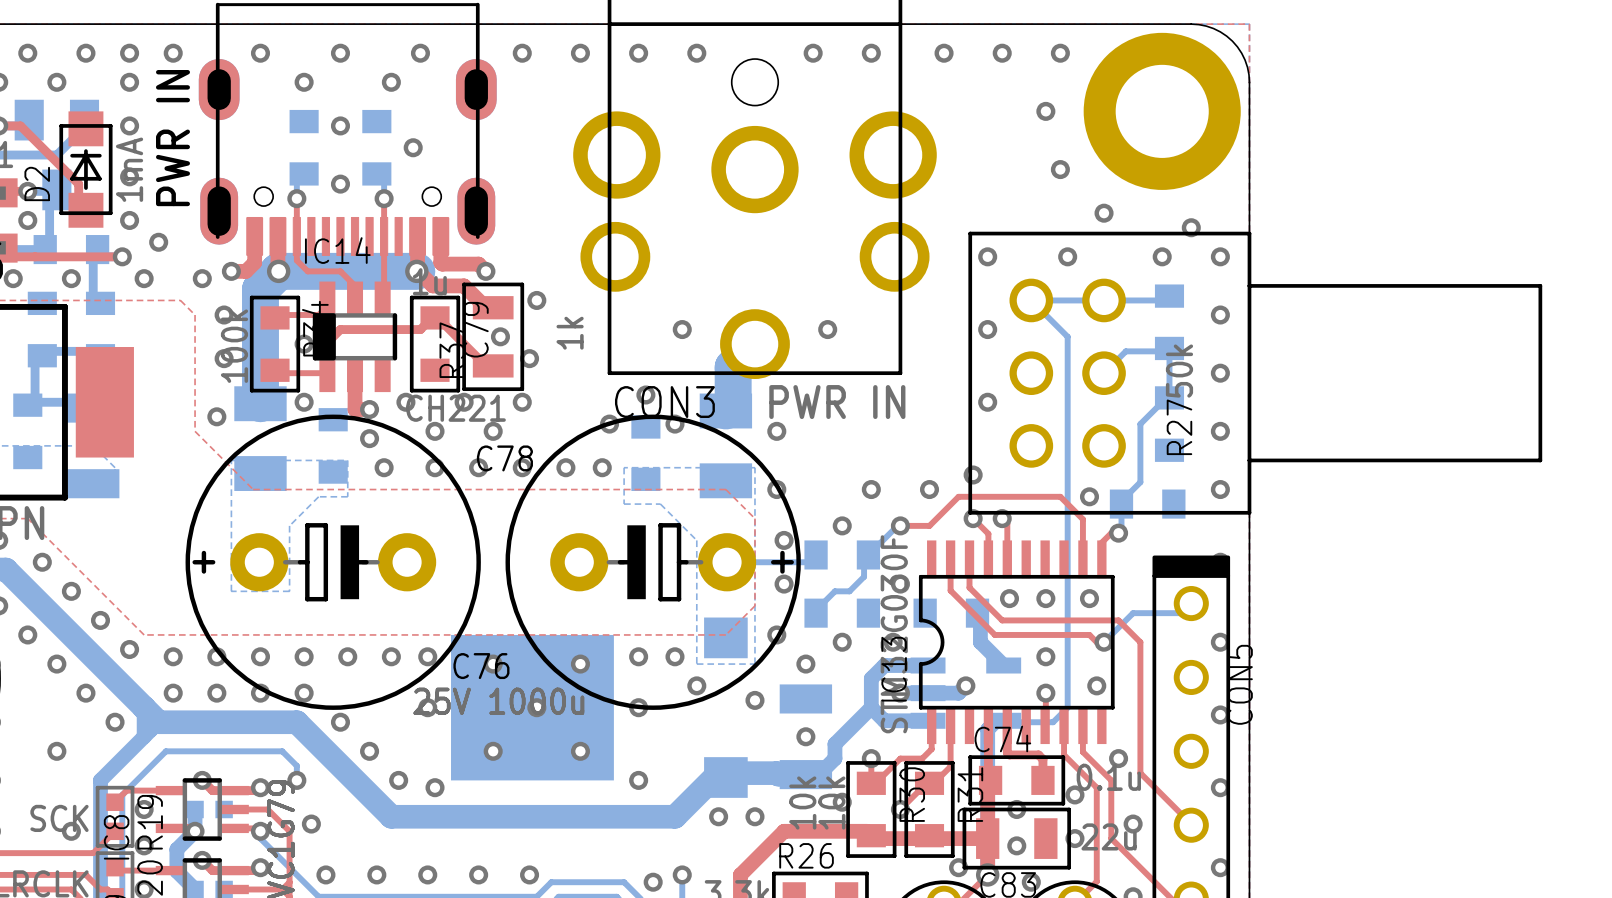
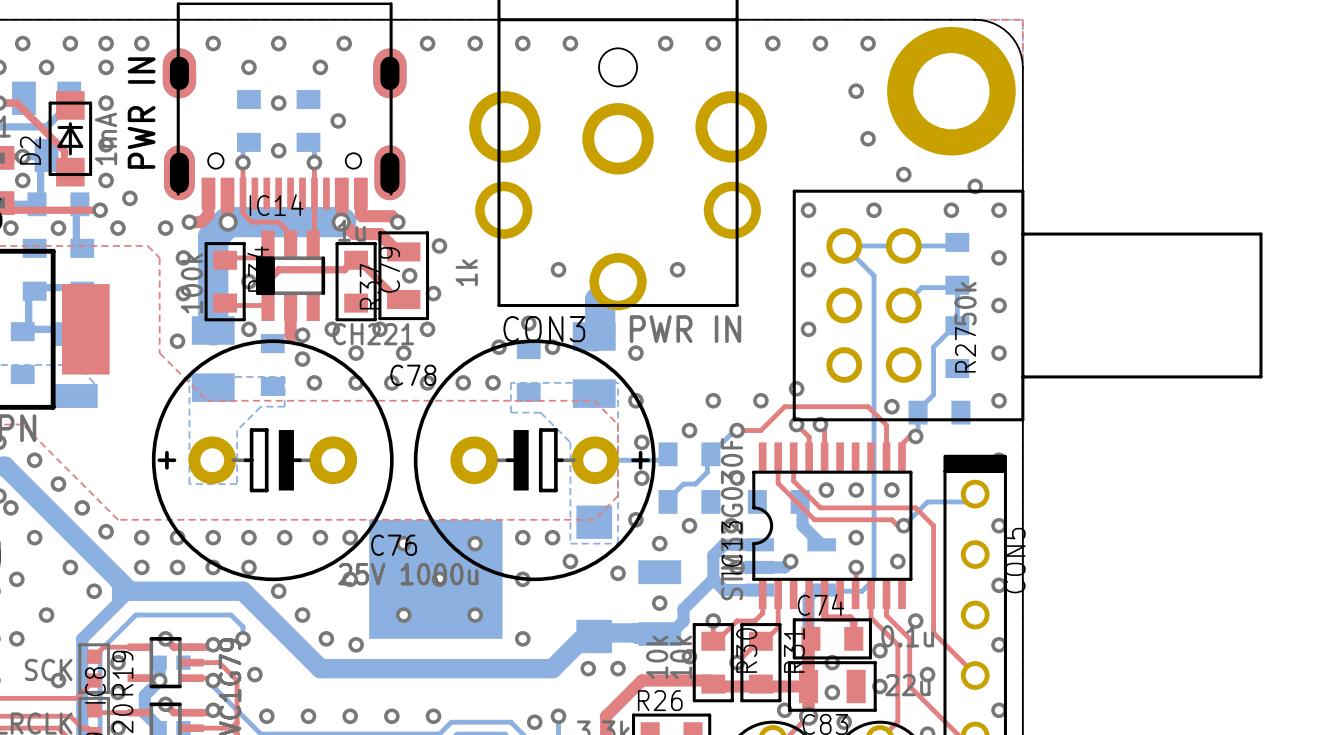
via position: (27, 634) -> (10, 507)
via position: (56, 664) -> (34, 537)
via: none -> (16, 579)
via: none -> (16, 638)

